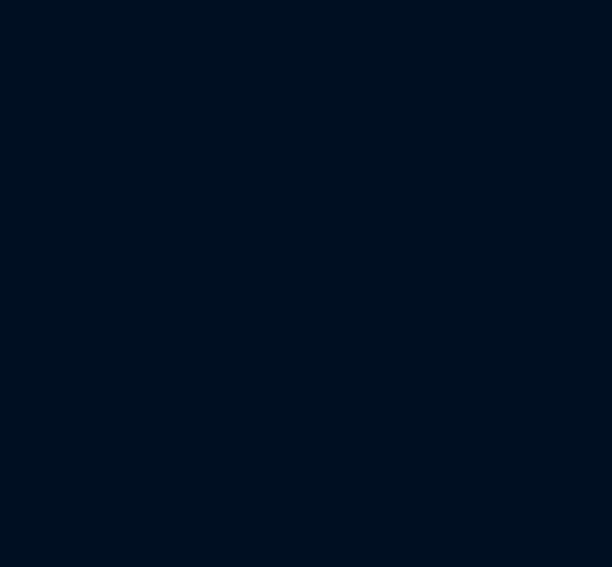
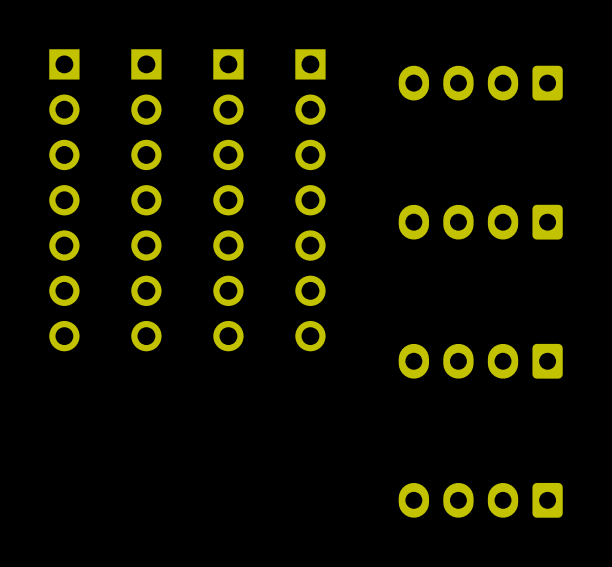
part: none -> (480, 83)
part: none -> (64, 200)
part: none -> (146, 200)
part: none -> (228, 200)
part: none -> (310, 200)
part: none -> (480, 222)
part: none -> (480, 361)
part: none -> (480, 500)

